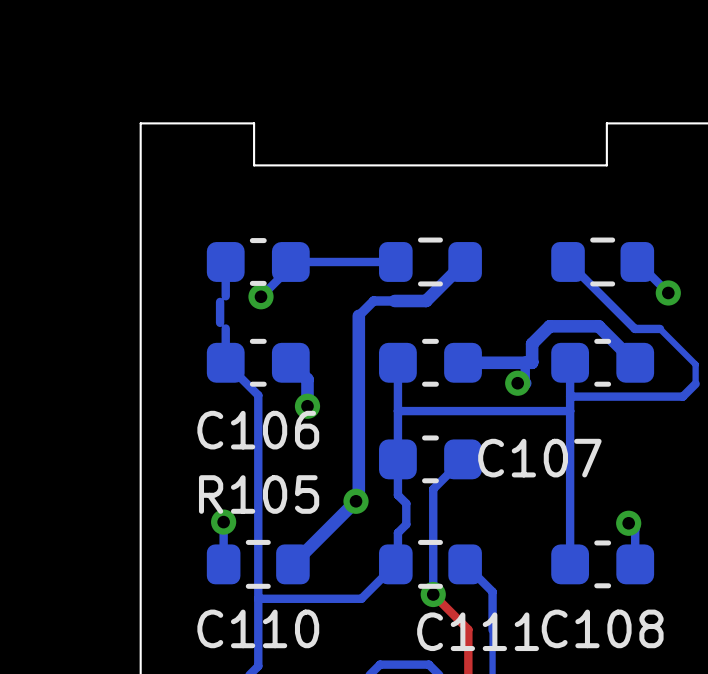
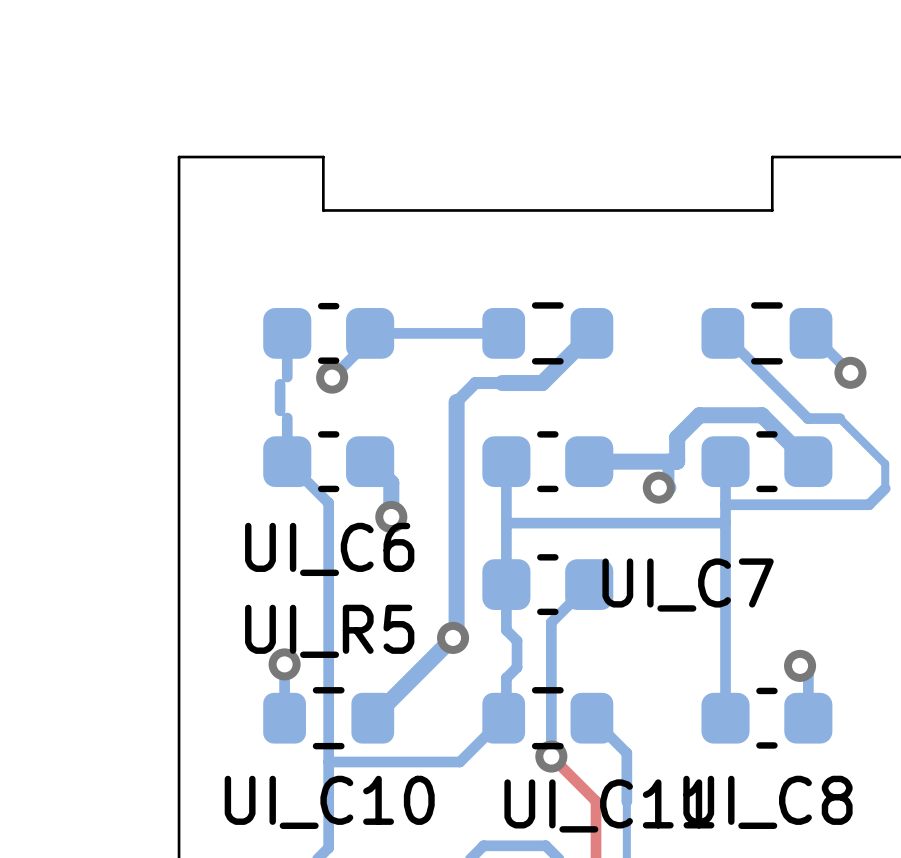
C106 name: C106 (258, 430) -> UI_C6 (329, 549)
C107 name: C107 (539, 458) -> UI_C7 (688, 585)
R105 name: R105 (259, 494) -> UI_R5 (329, 631)
C110 name: C110 (258, 628) -> UI_C10 (329, 802)
C108 name: C108 (602, 628) -> UI_C8 (767, 802)
C111 name: C111 (478, 631) -> UI_C11 (609, 805)

